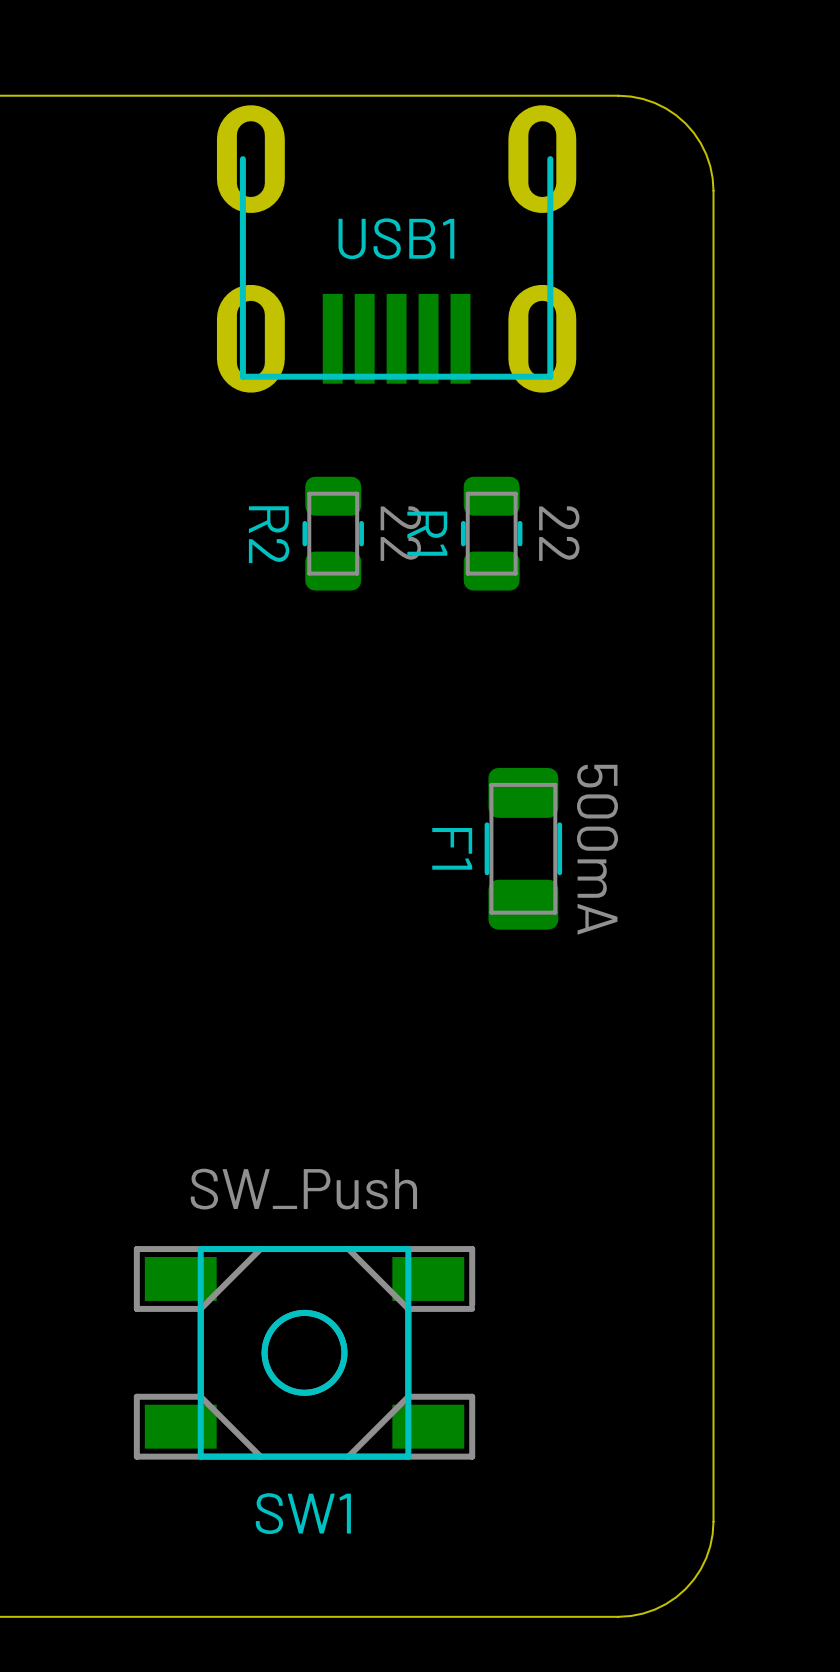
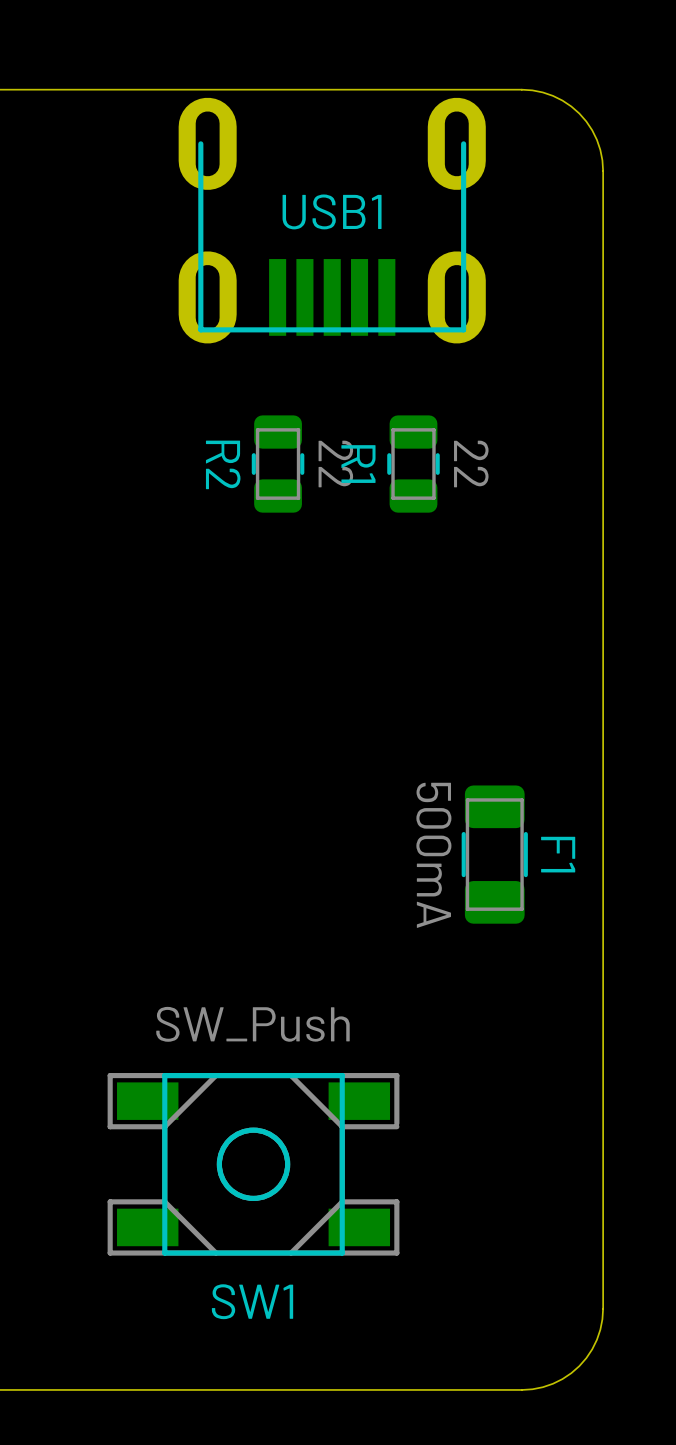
F1 name position: F1 (452, 848) -> F1 (558, 854)
F1 position: (523, 848) -> (494, 854)
F1 value position: 500mA (597, 849) -> 500mA (433, 855)

